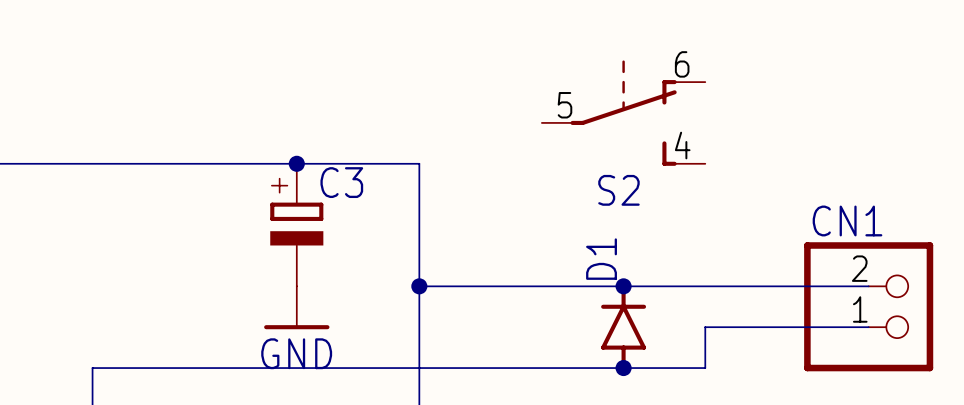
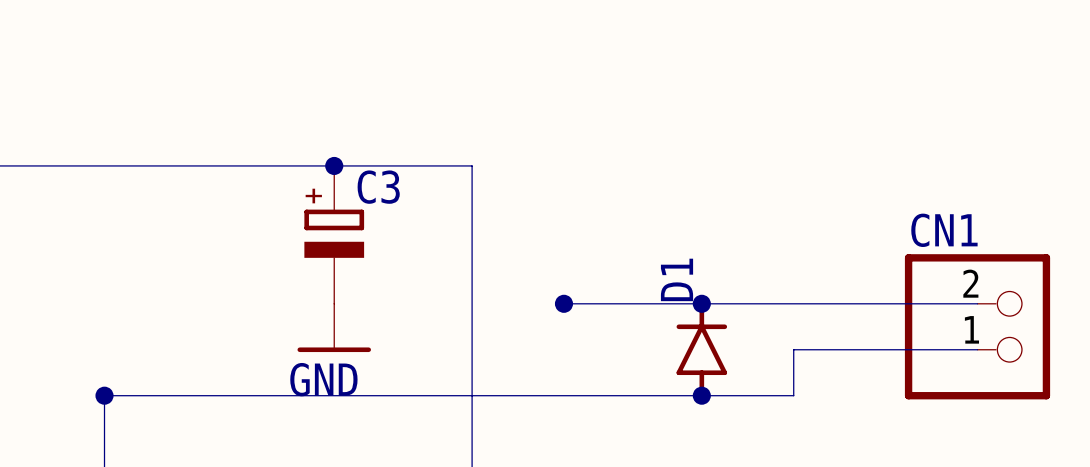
S2: (623, 113) -> none
wire: (419, 286) (501, 286) -> none
junction position: (419, 286) -> (563, 303)
junction: none -> (104, 395)

